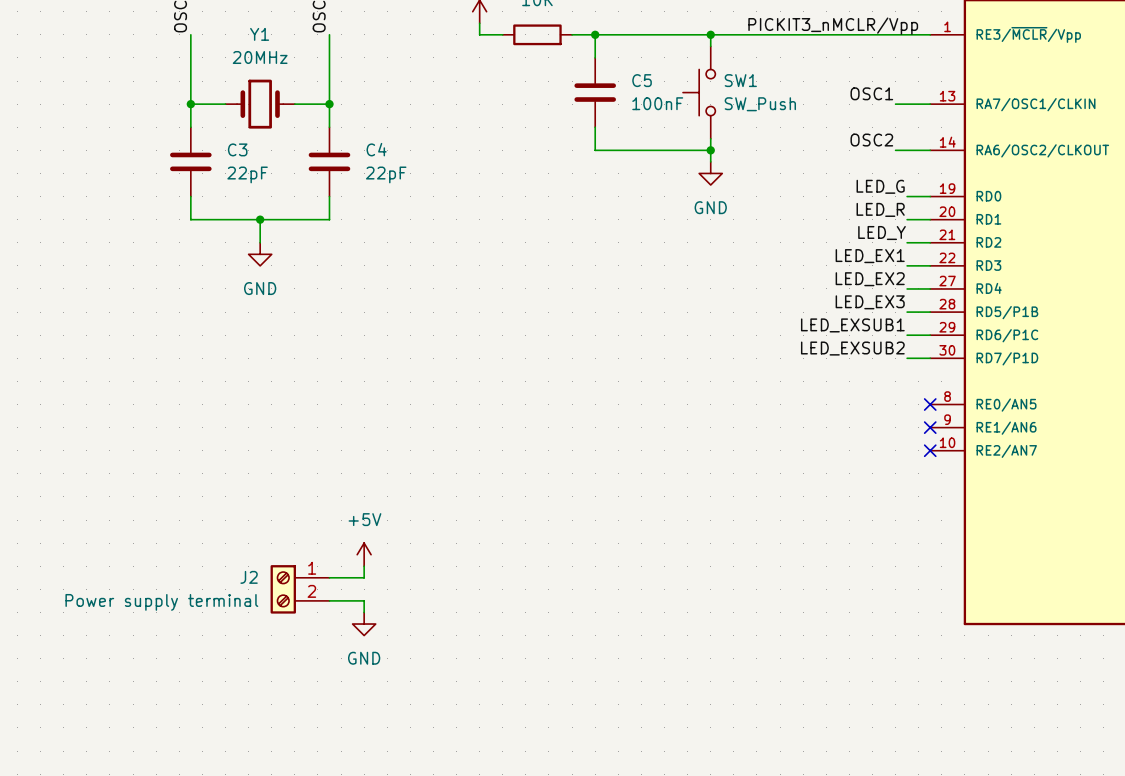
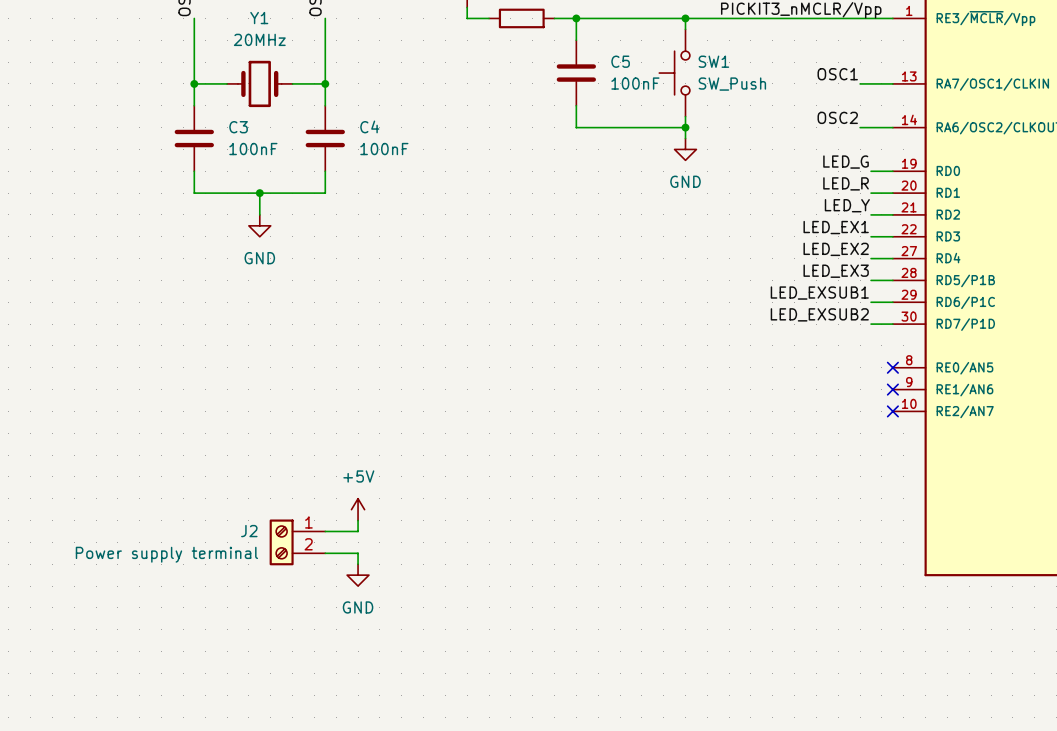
C3 value: 22pF (247, 174) -> 100nF (253, 149)
C4 value: 22pF (386, 174) -> 100nF (384, 149)

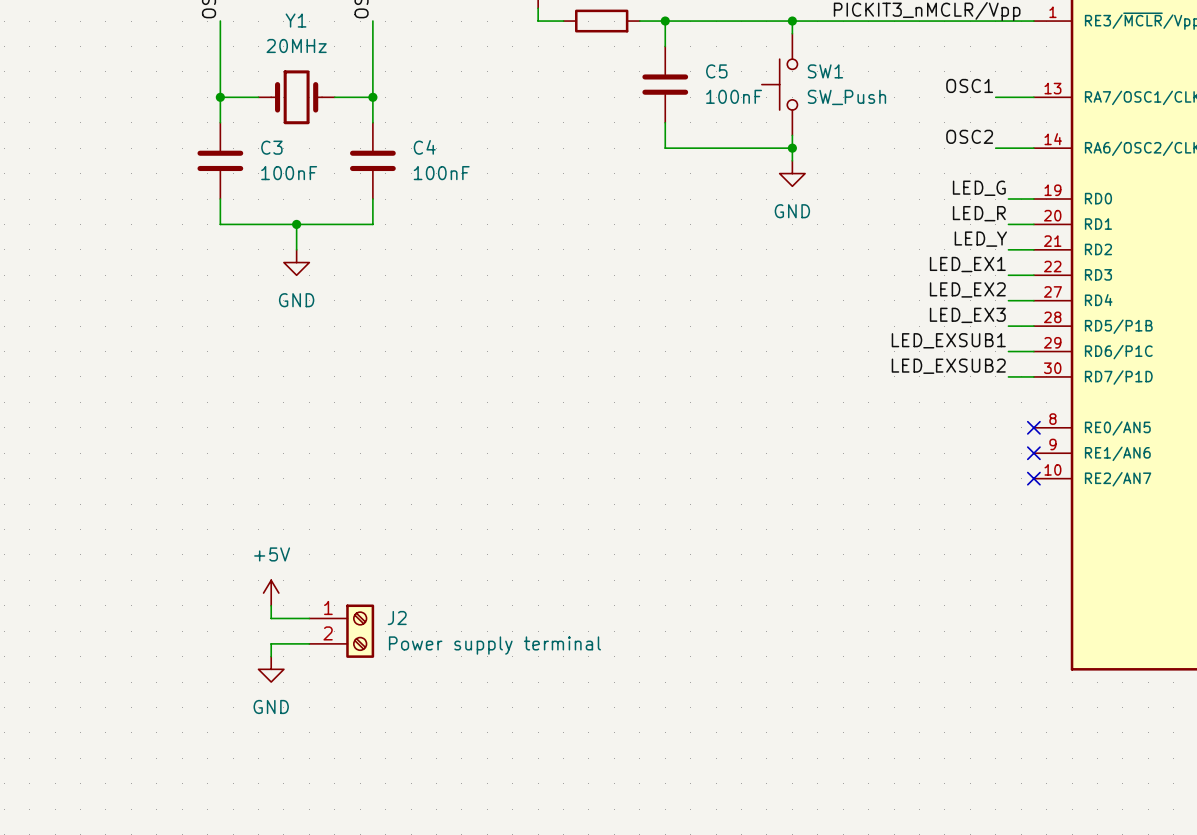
power symbol position: +5V (358, 509) -> +5V (271, 593)
wire: none -> (271, 605) (271, 618) (309, 618)
wire: (358, 520) (358, 531) (325, 531) -> none
J2 flip: as is (281, 542) -> left-right (360, 631)
wire: none -> (309, 643) (271, 643) (271, 656)
wire: (325, 553) (358, 553) (358, 564) -> none
power symbol position: GND (358, 575) -> GND (271, 669)

